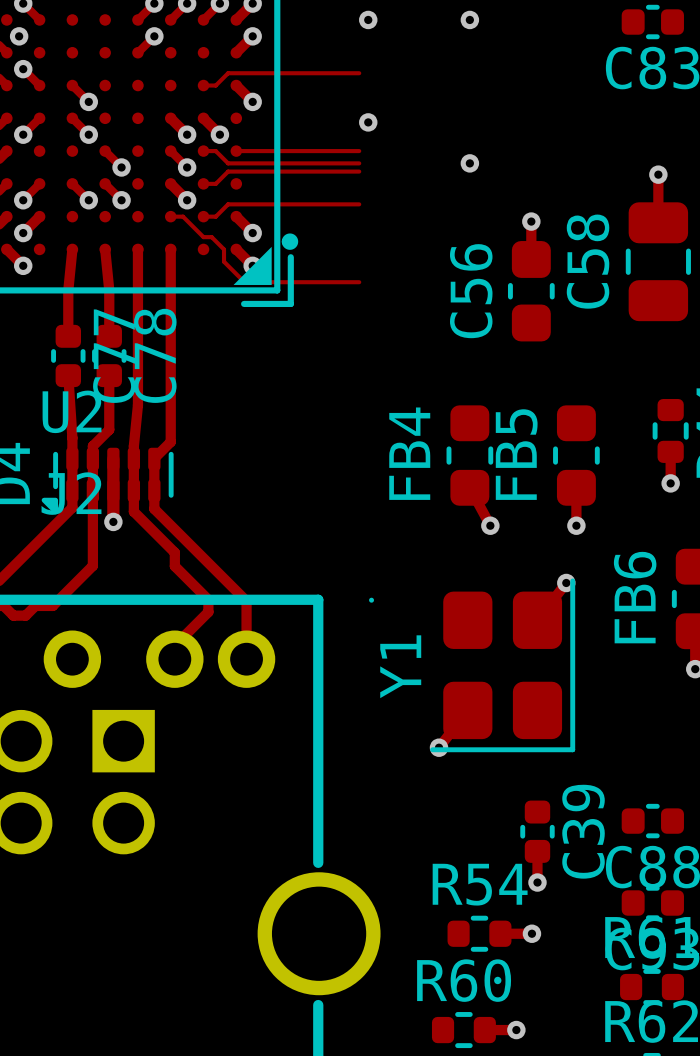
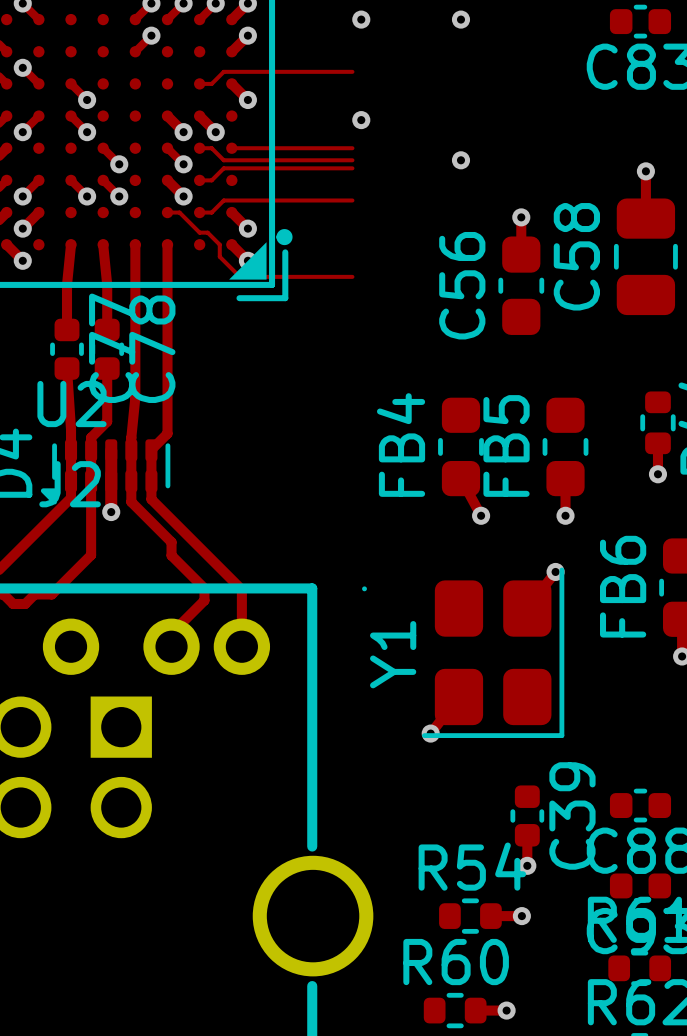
via: (19, 36) -> none

